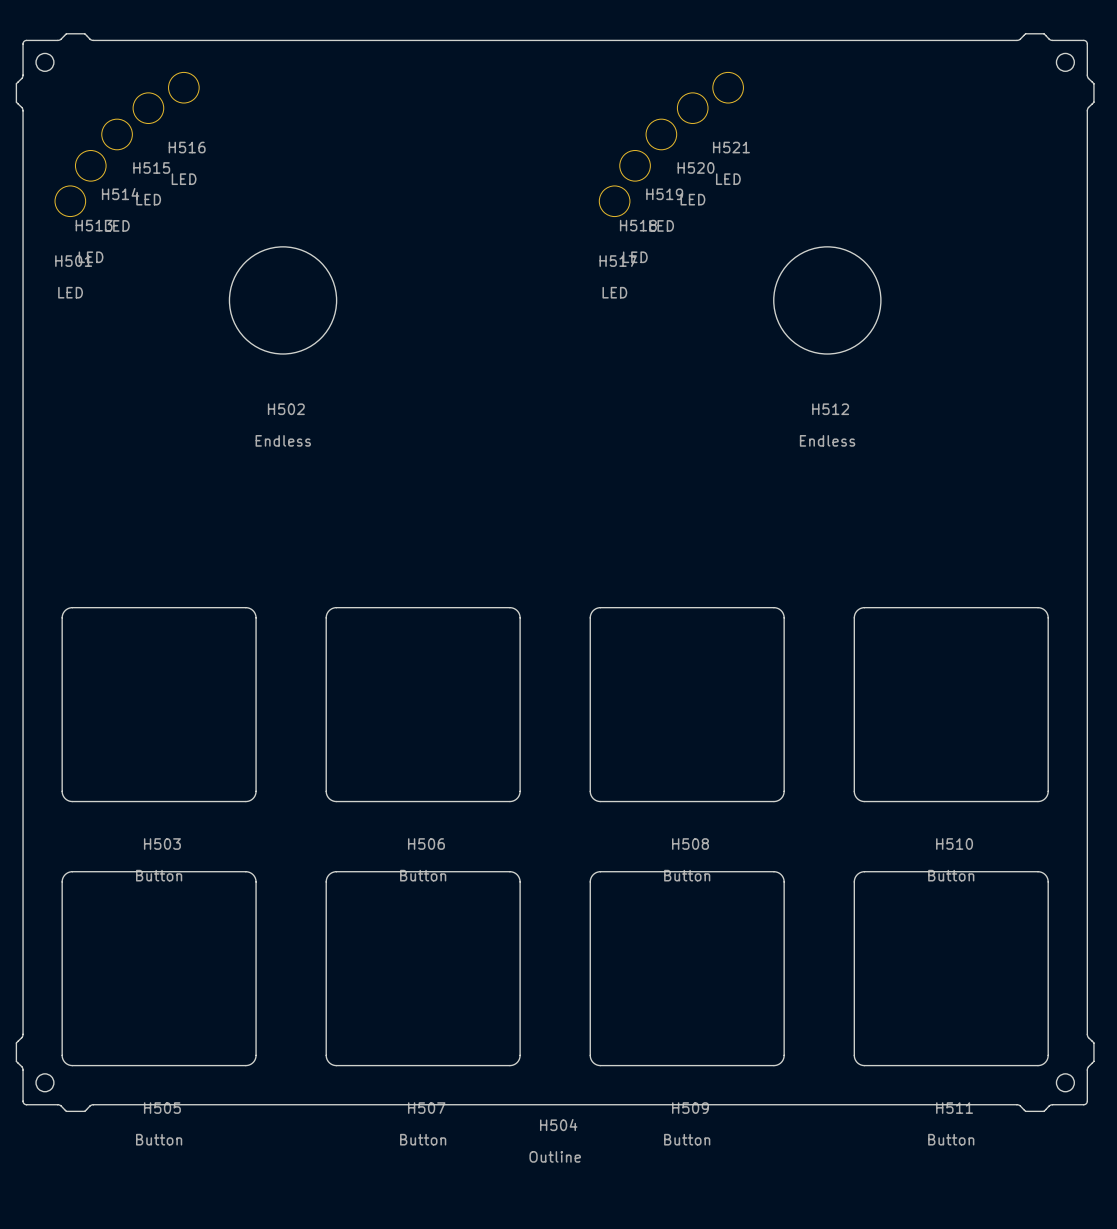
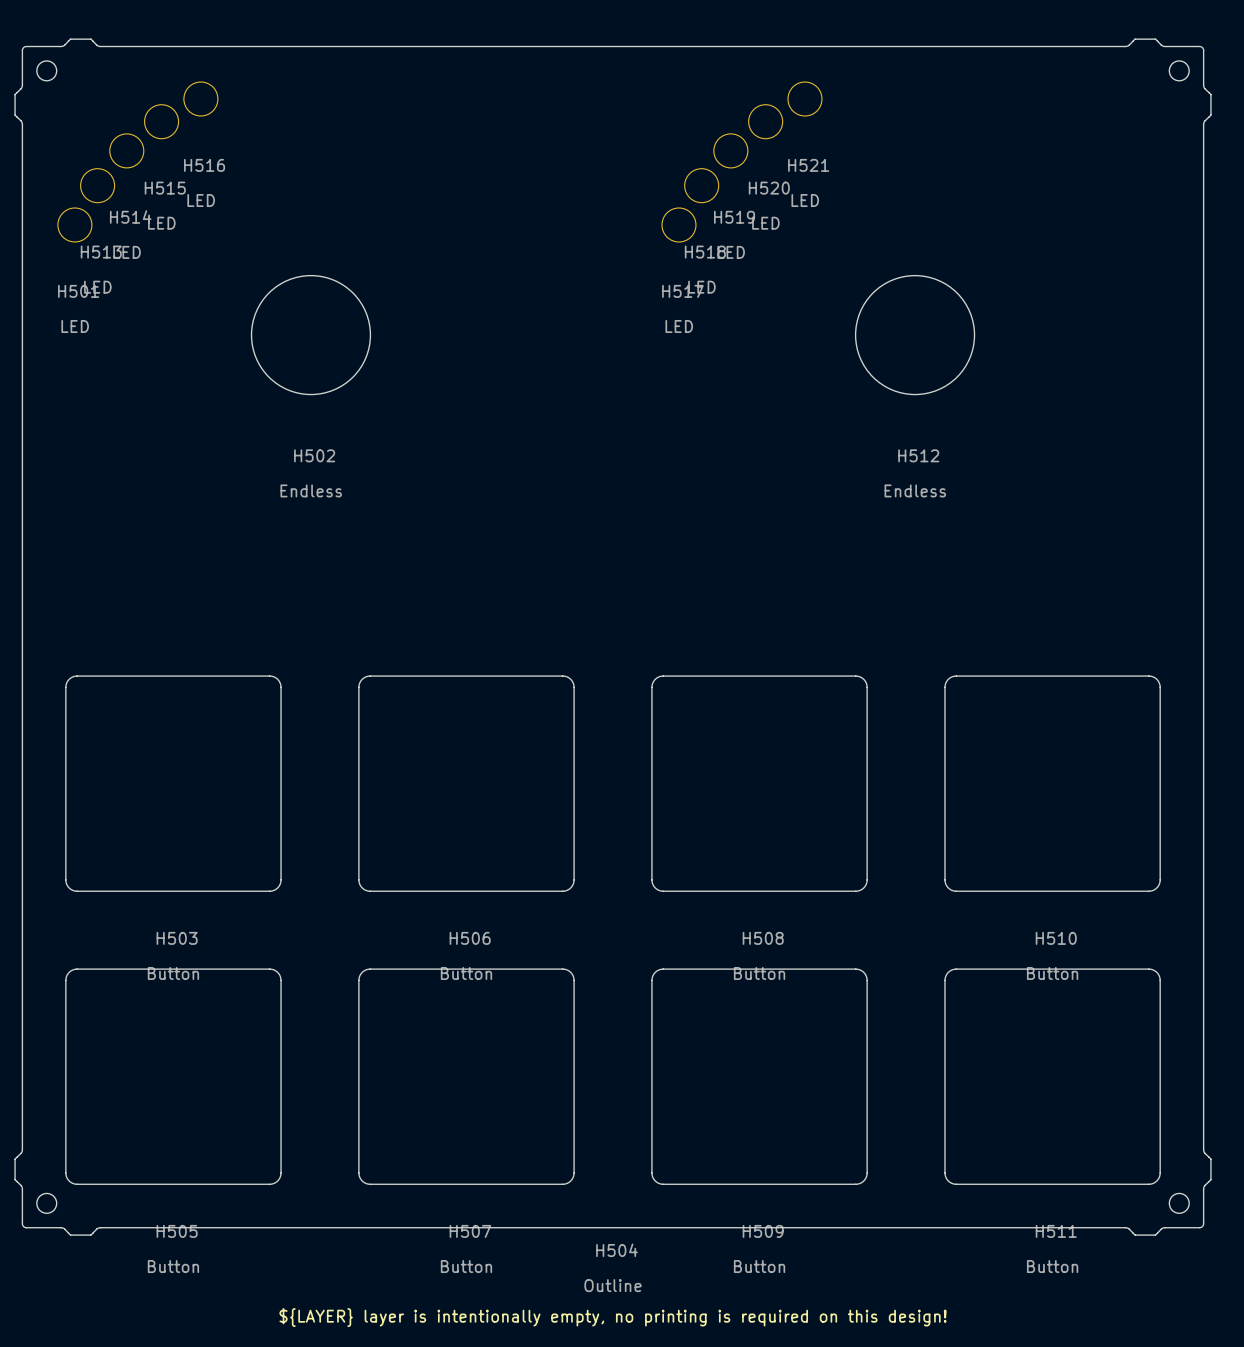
text: none -> ${LAYER} layer is intentionally empty, no printing is required on this design! (613, 1317)

